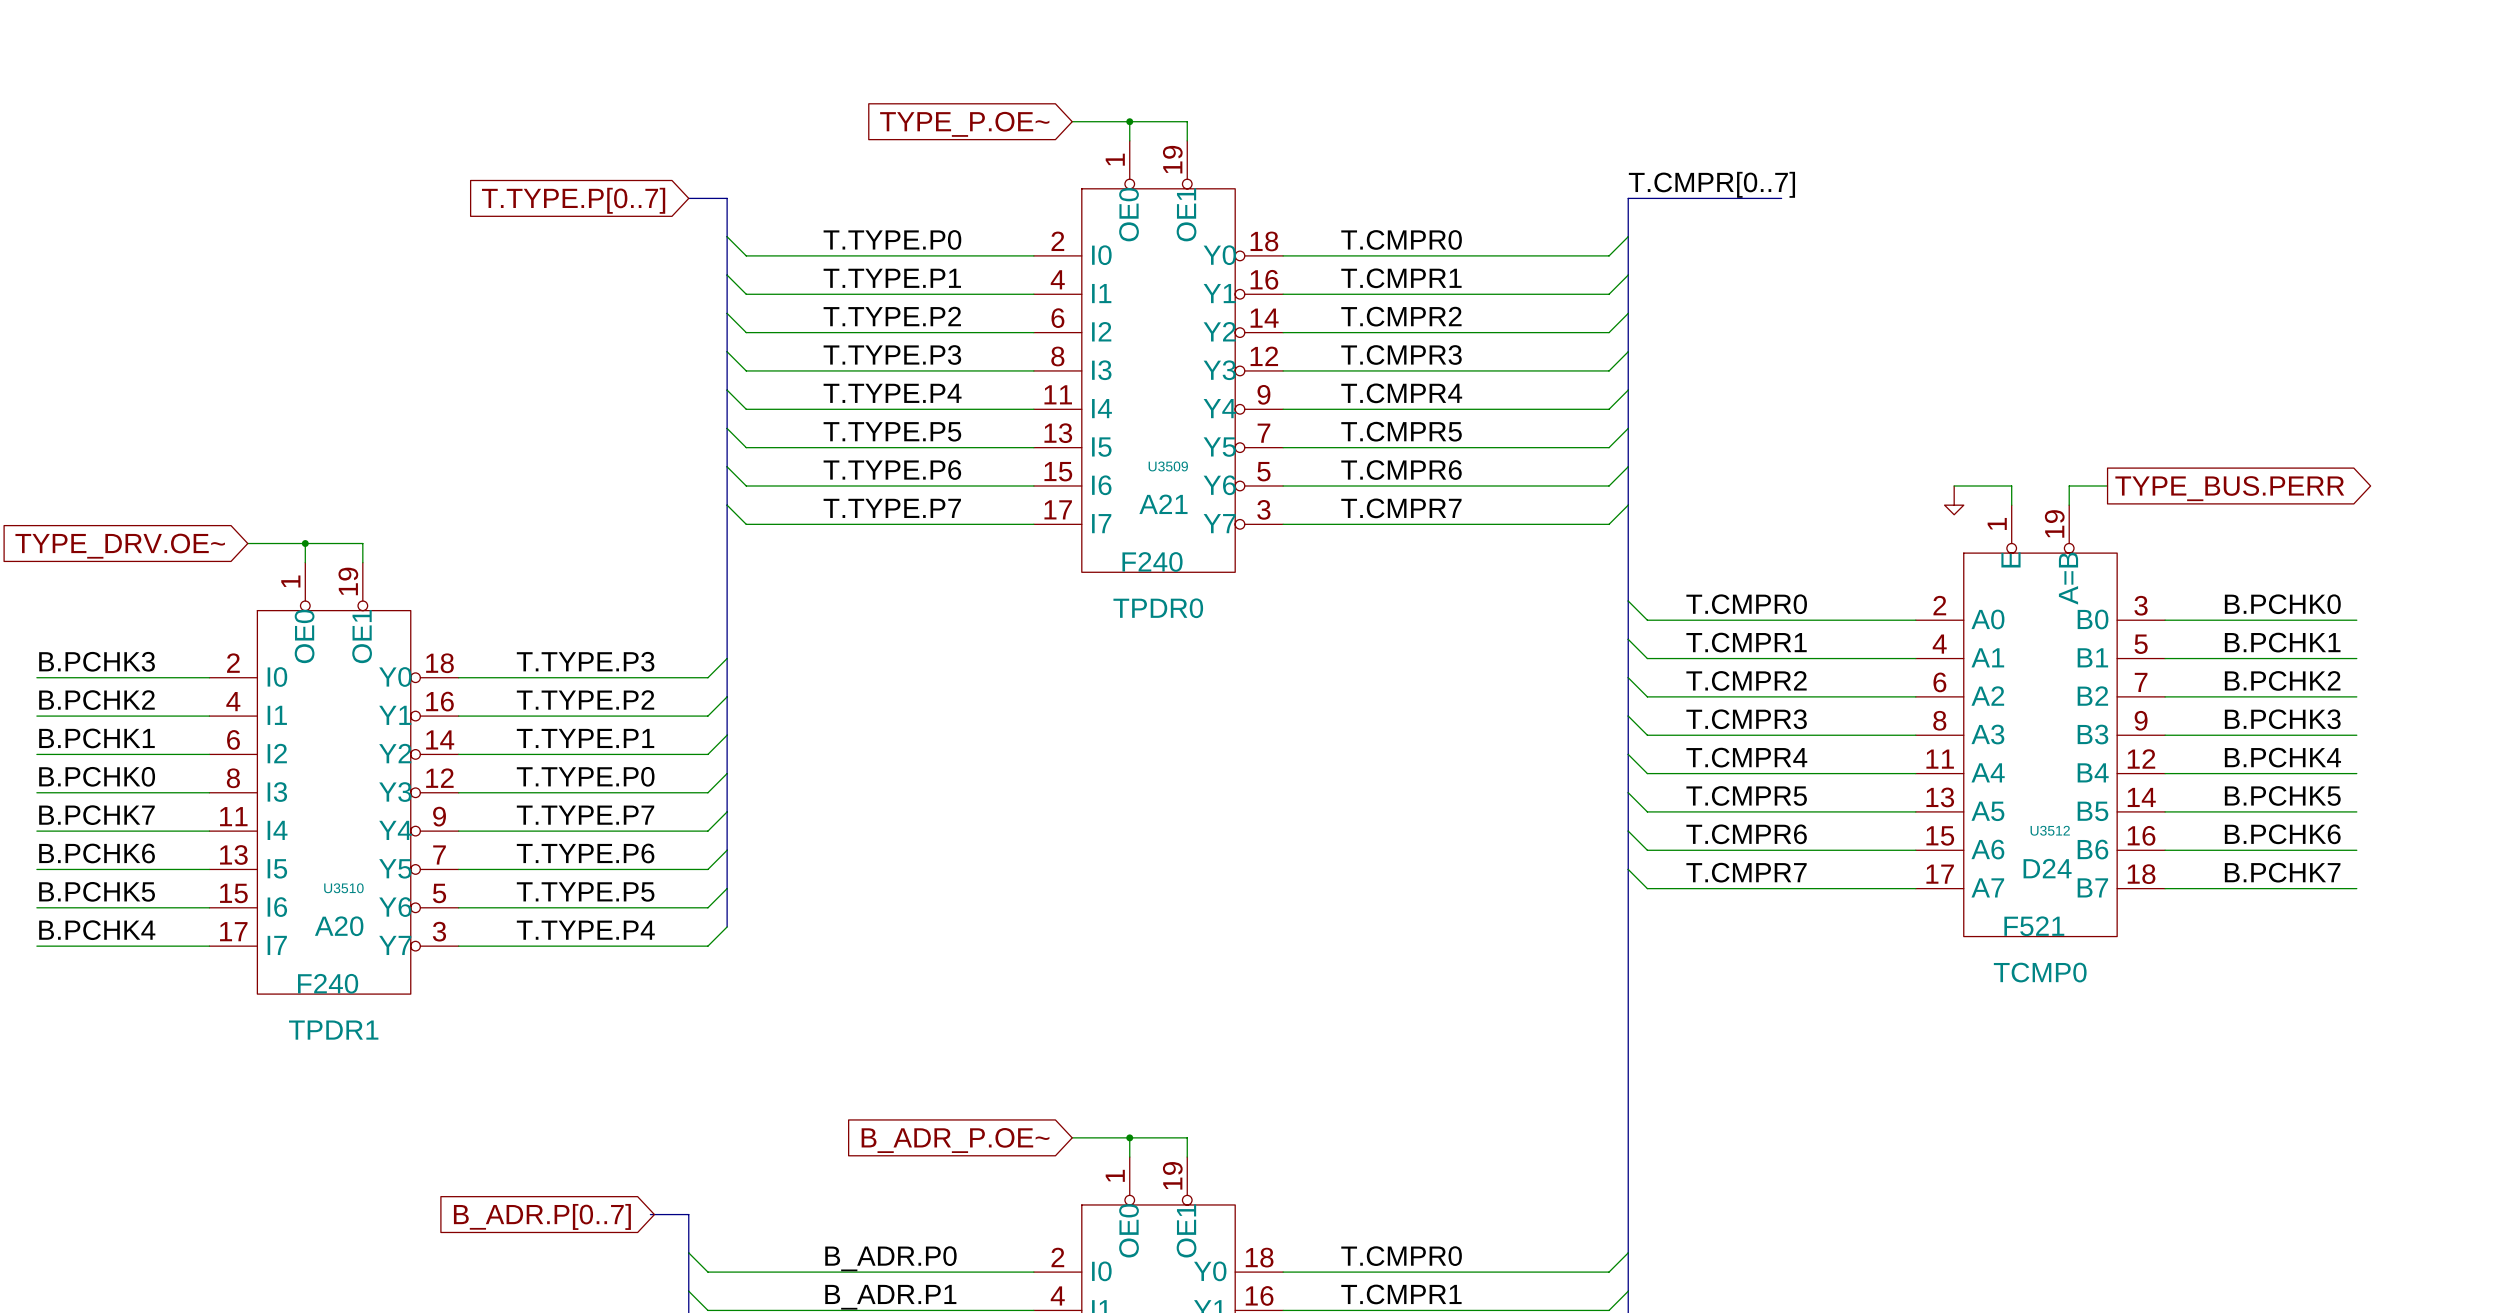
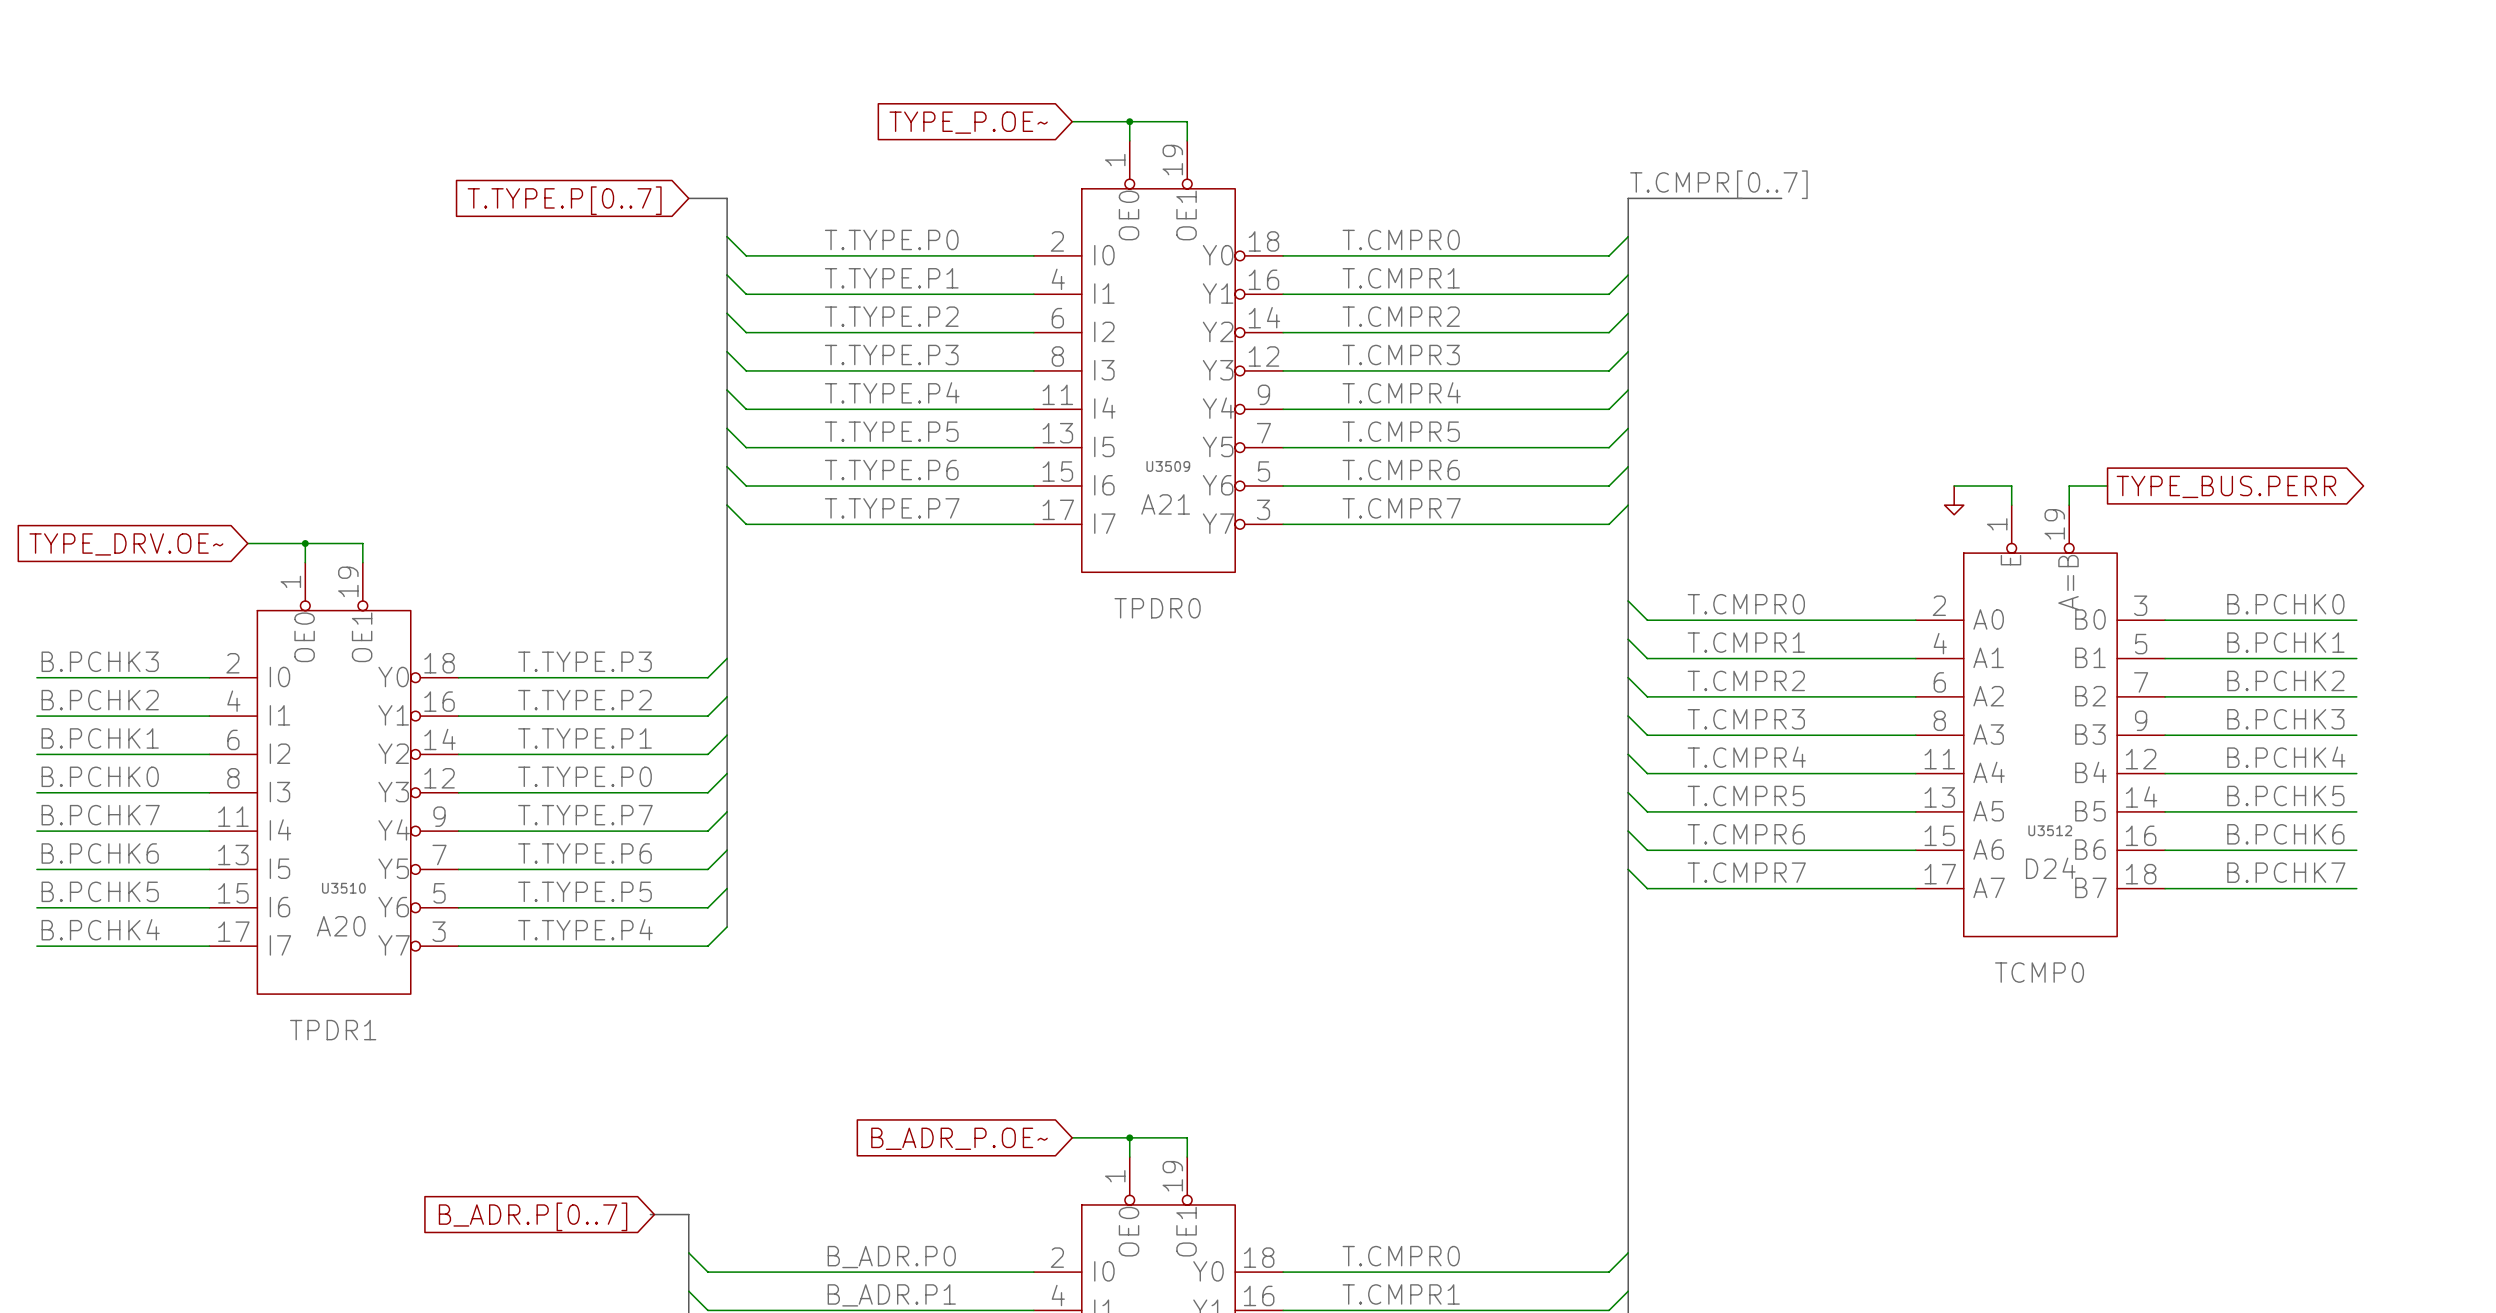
U3509 value: F240 (1152, 561) -> none
U3512 value: F521 (2034, 926) -> none
U3510 value: F240 (328, 983) -> none

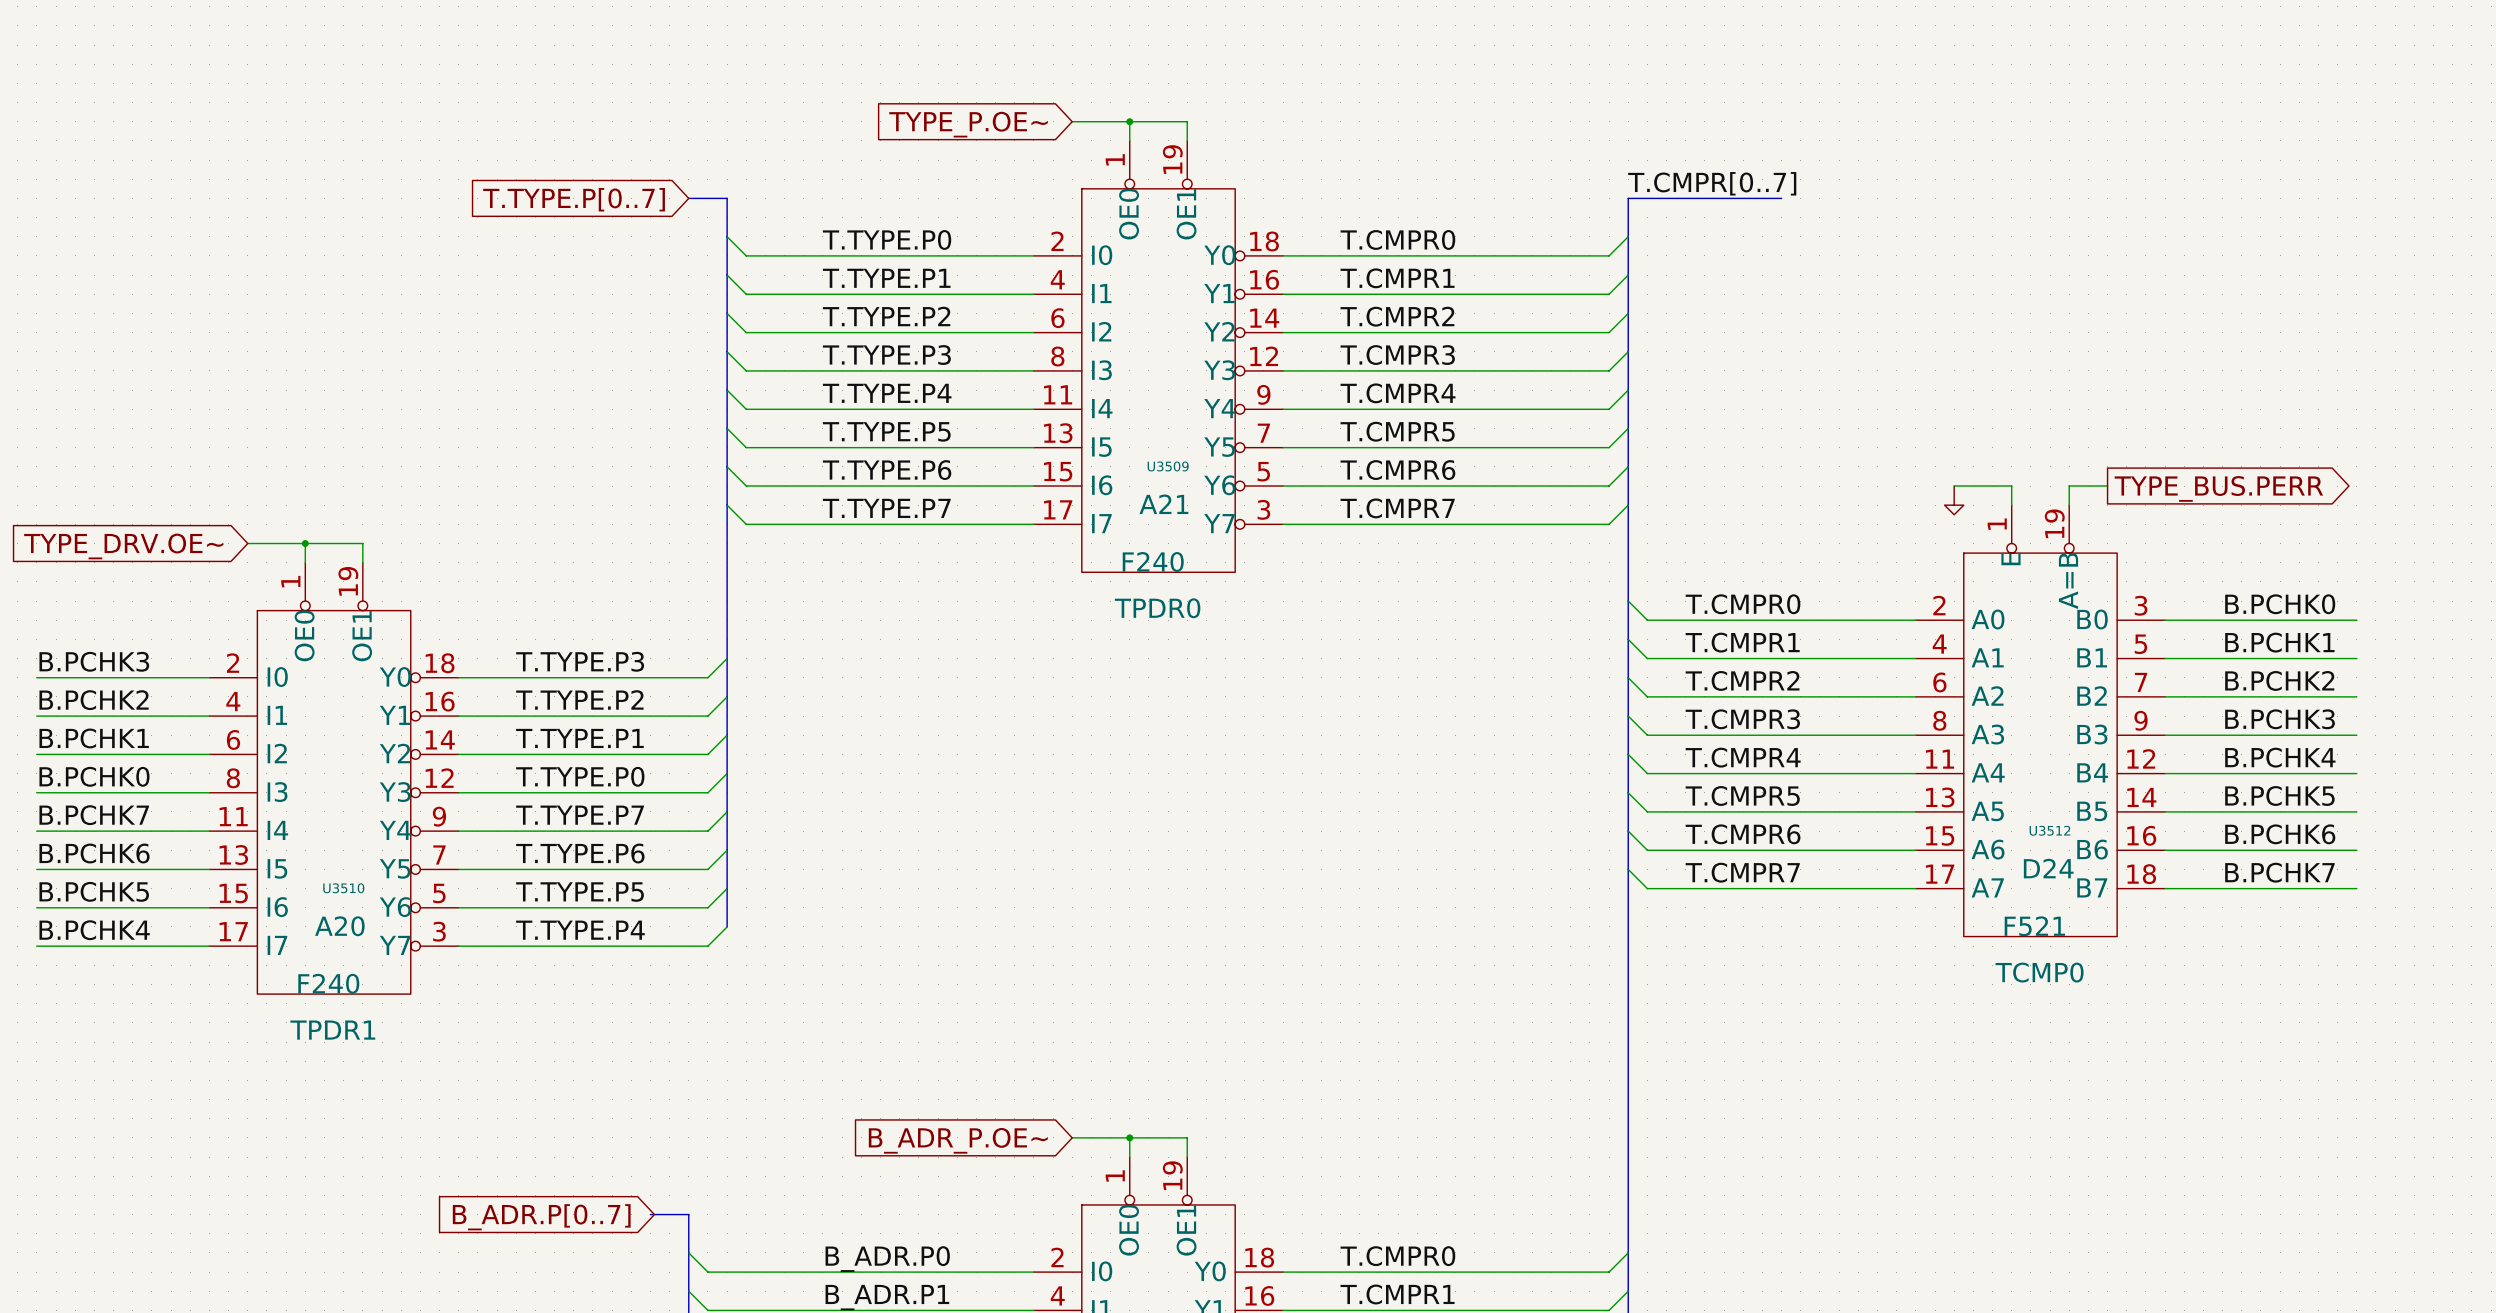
U3509 value: none -> F240 (1153, 561)
U3512 value: none -> F521 (2034, 926)
U3510 value: none -> F240 (328, 983)

